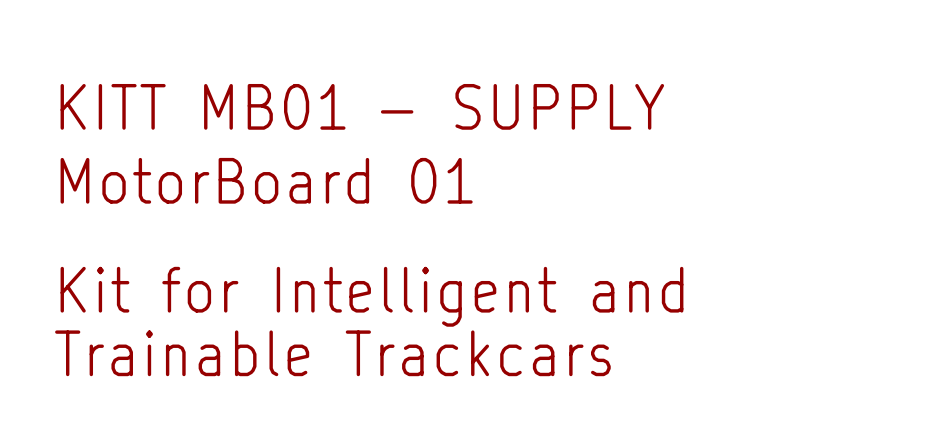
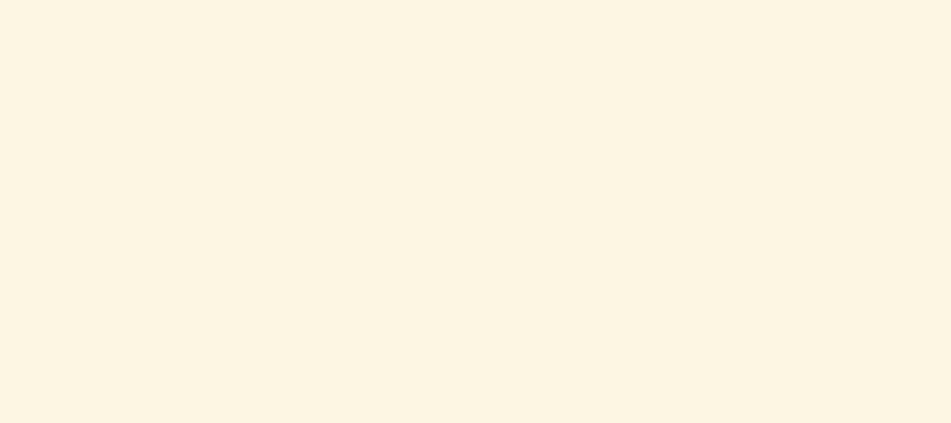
text: KITT MB01 (203, 106) -> none
text: - SUPPLY (522, 106) -> none
text: MotorBoard 01 (266, 180) -> none
text: Kit for Intelligent and (371, 296) -> none
text: Trainable Trackcars (332, 353) -> none

